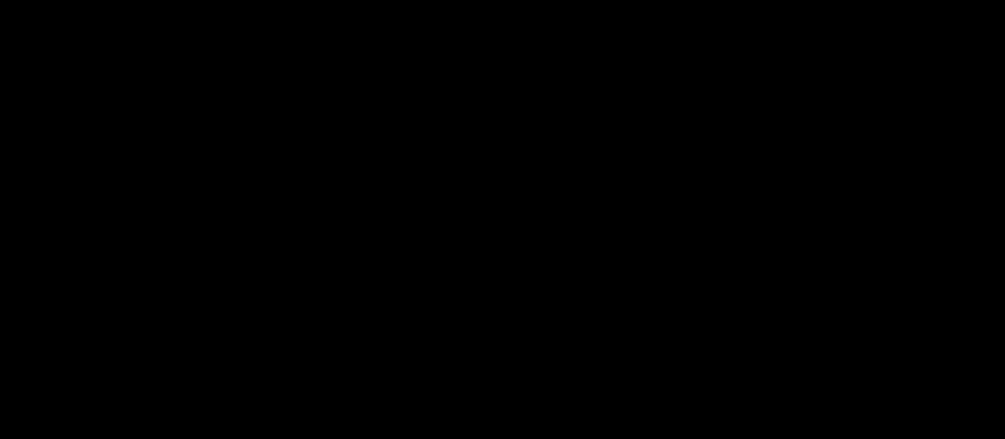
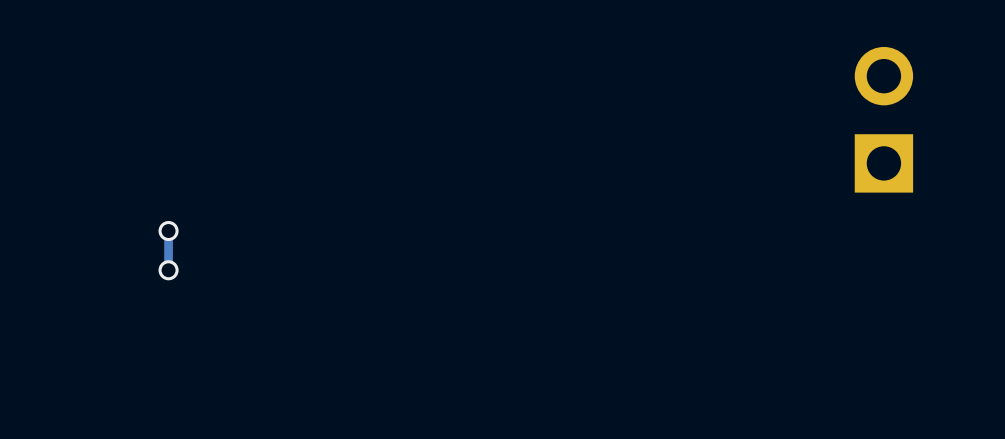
part: none -> (883, 119)
track: none -> (168, 231) (168, 270)
via: none -> (168, 231)
via: none -> (168, 270)

